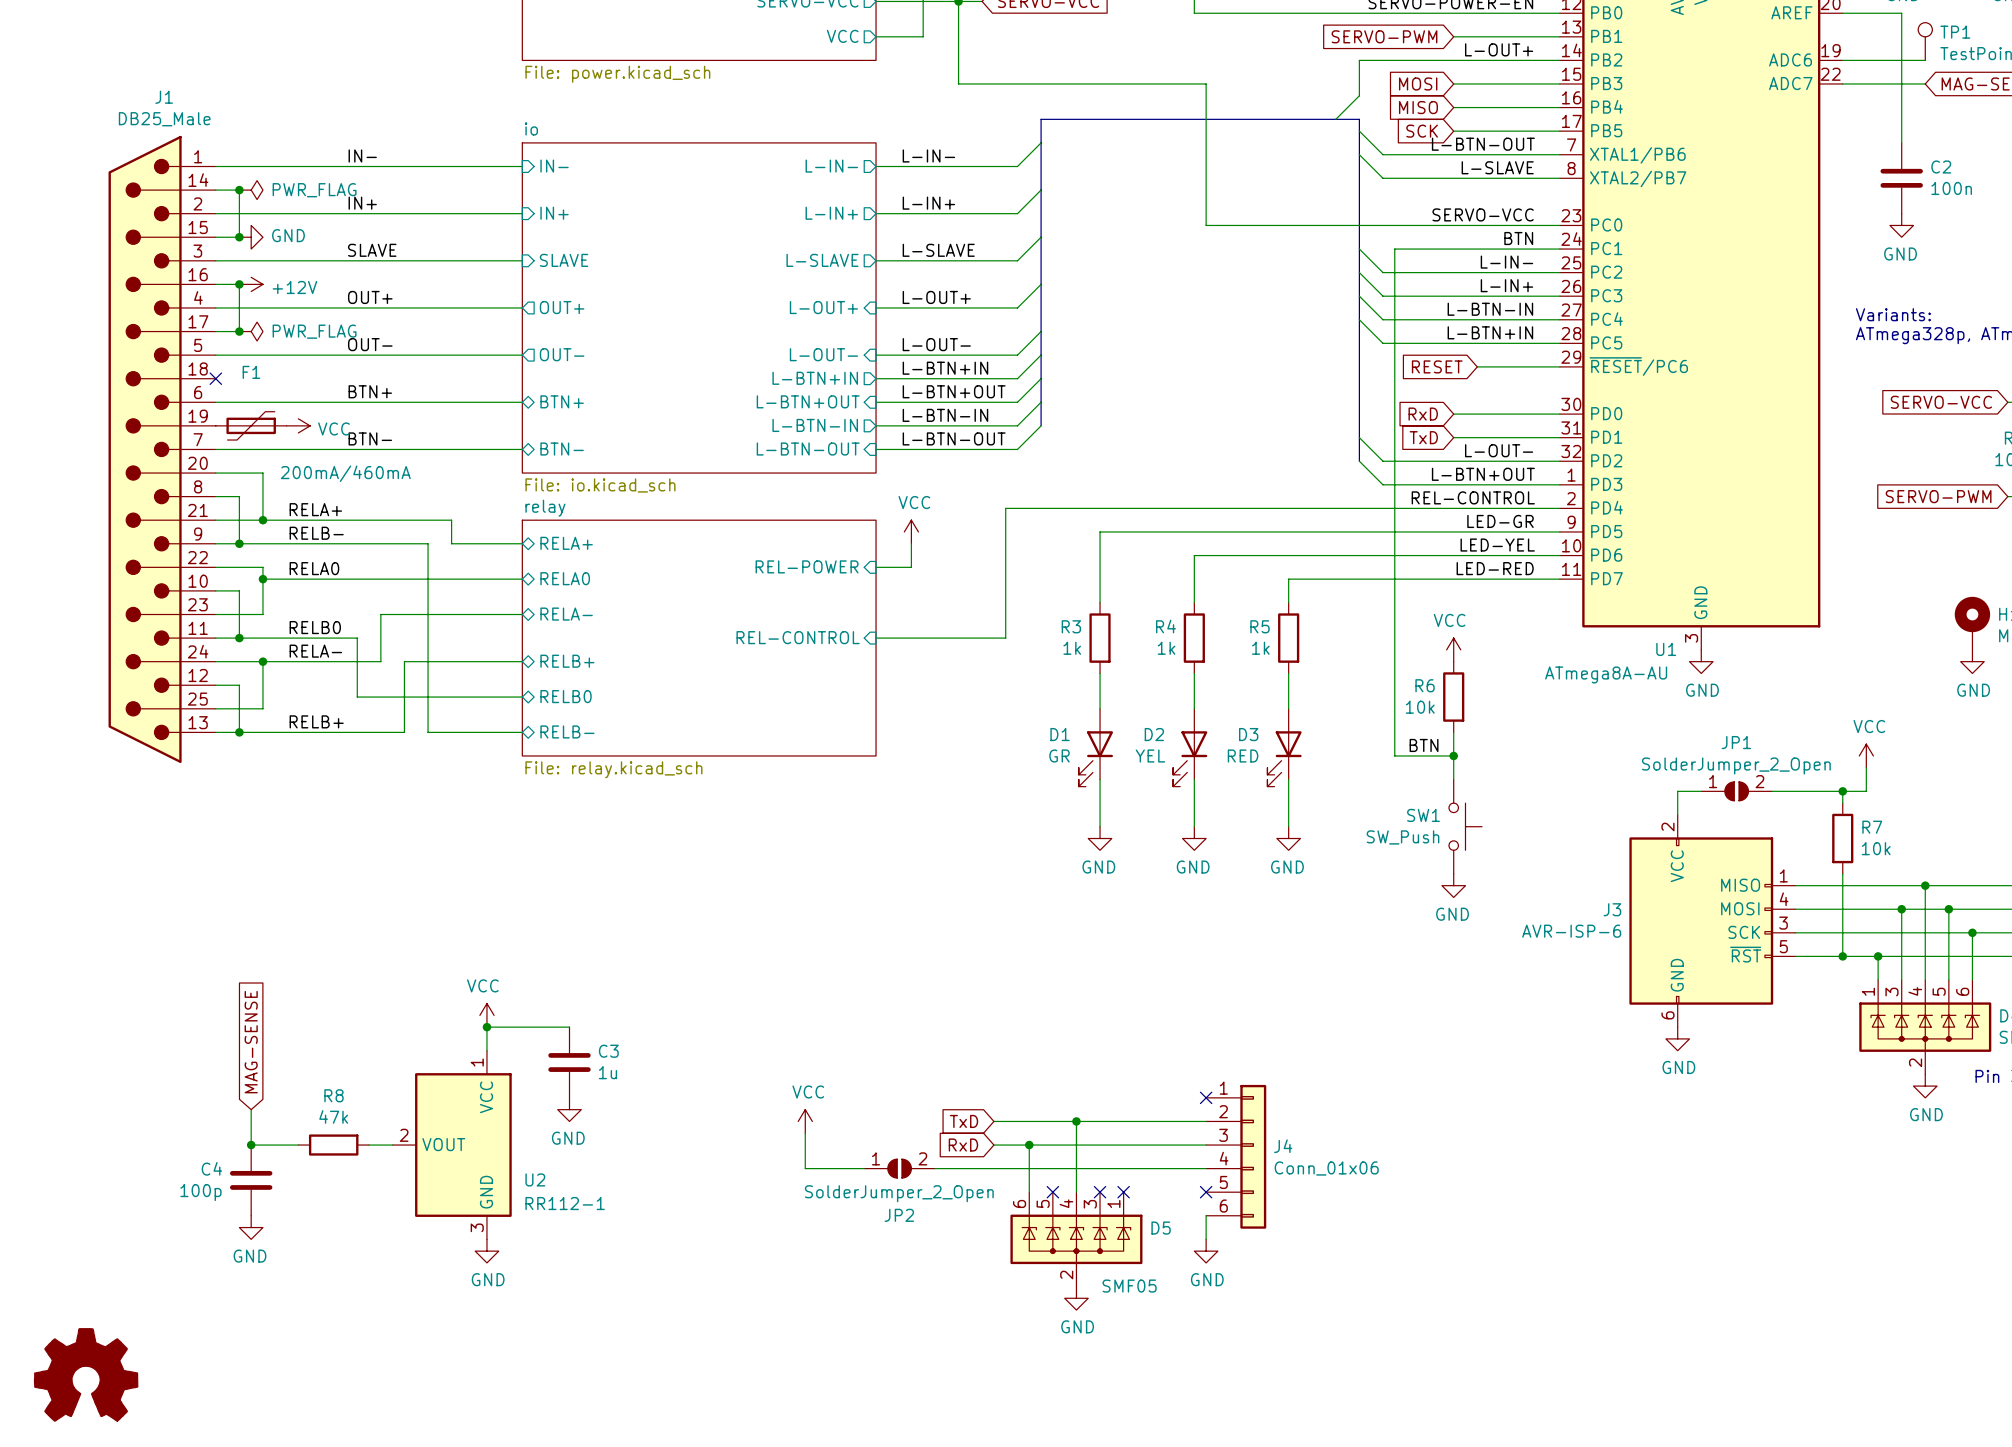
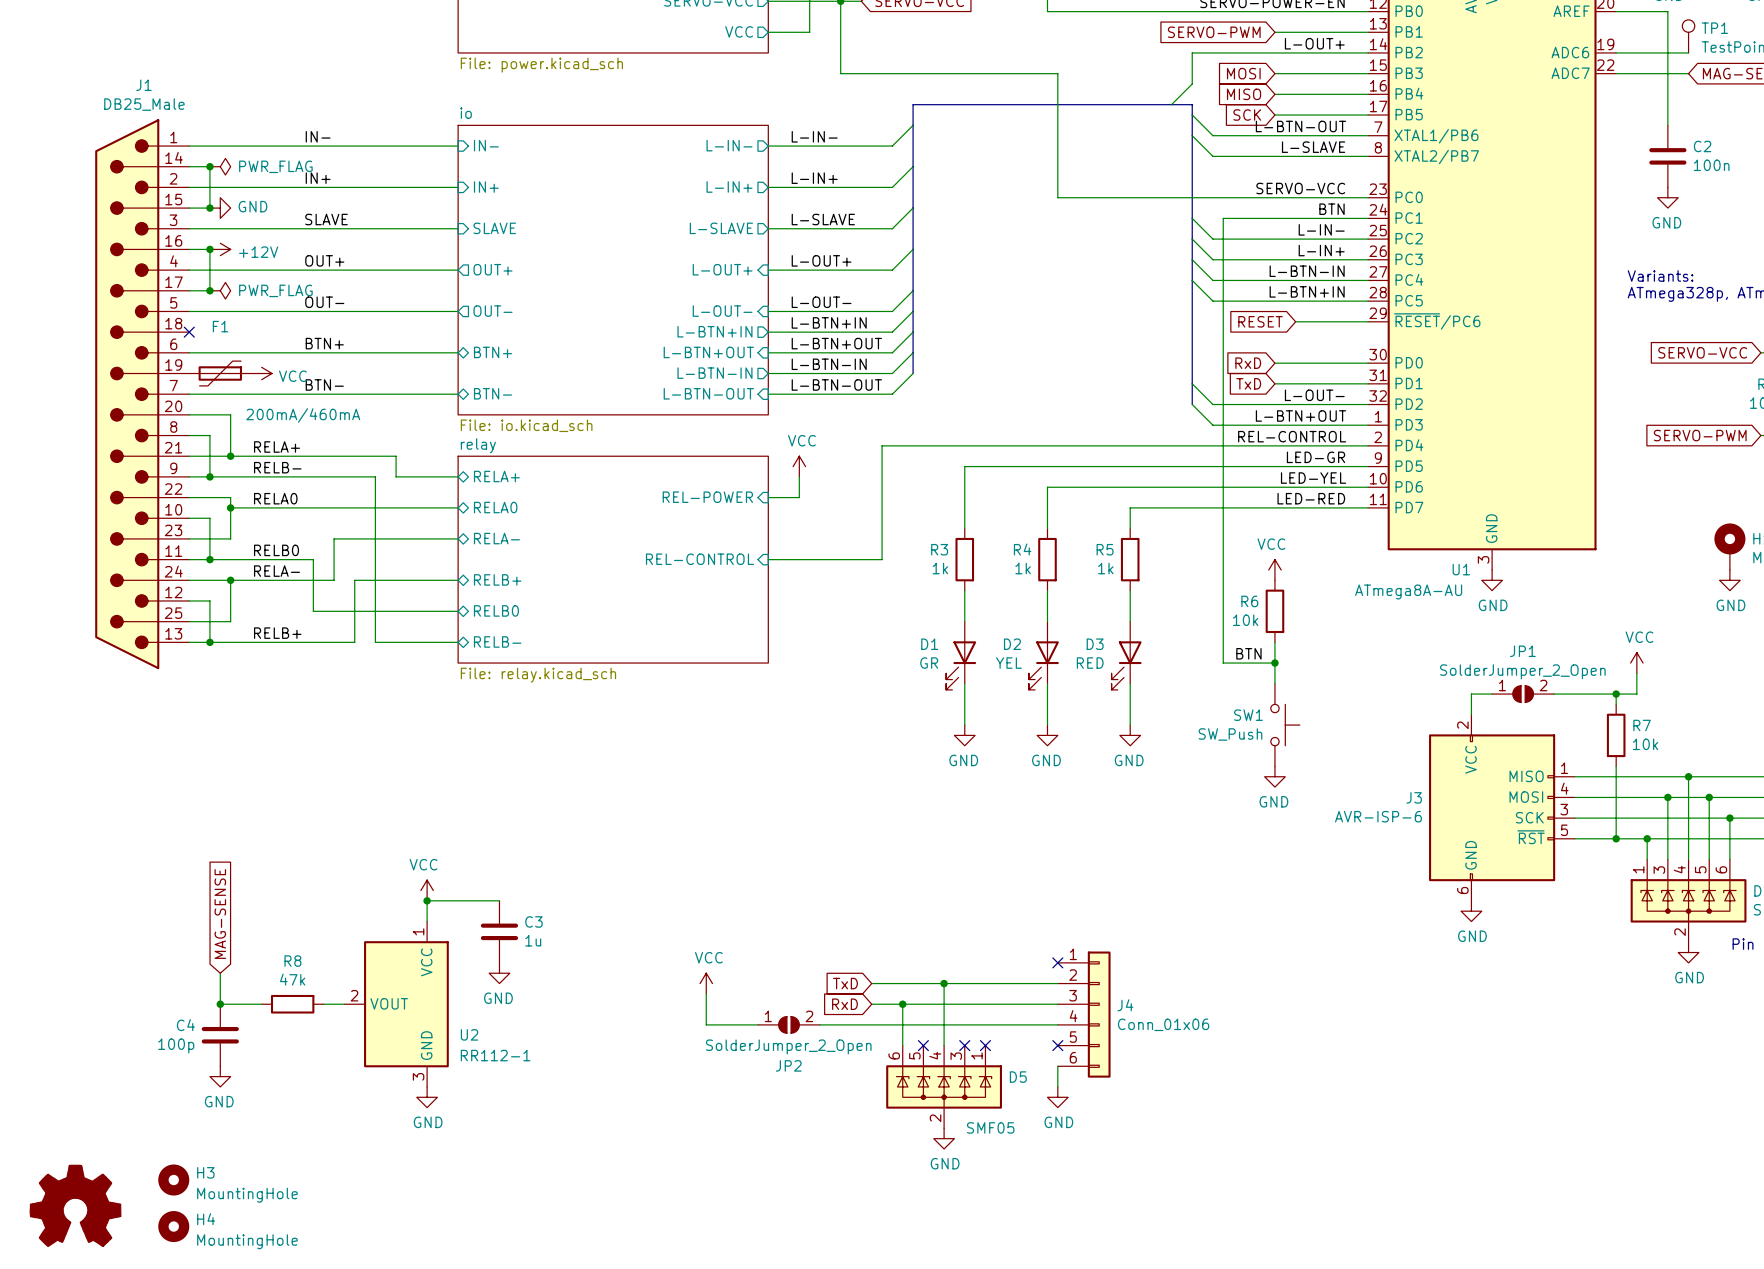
H3: none -> MountingHole (173, 1180)
H4: none -> MountingHole (173, 1226)

